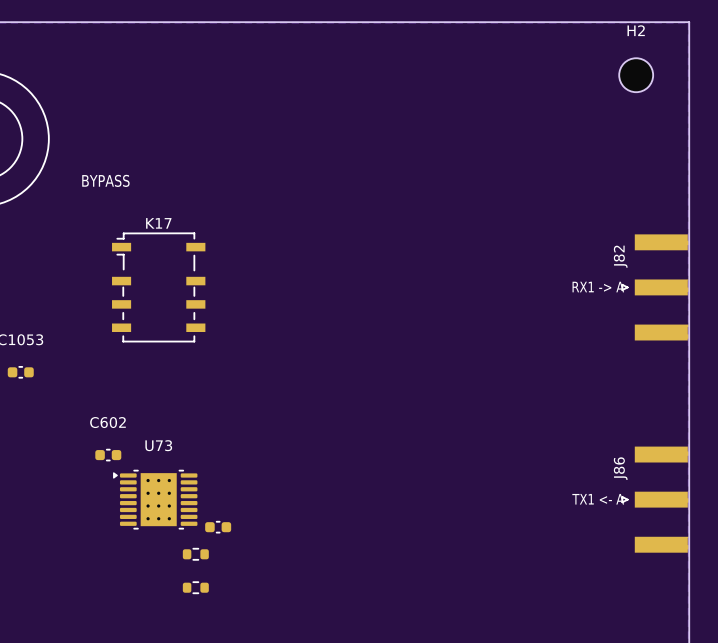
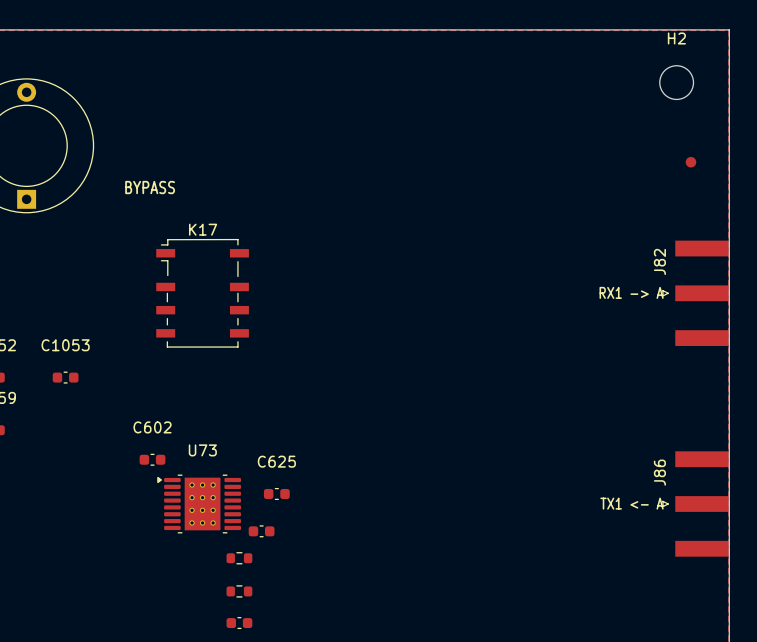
part: none -> (690, 162)
C625: none -> (276, 493)
part: none -> (239, 623)

